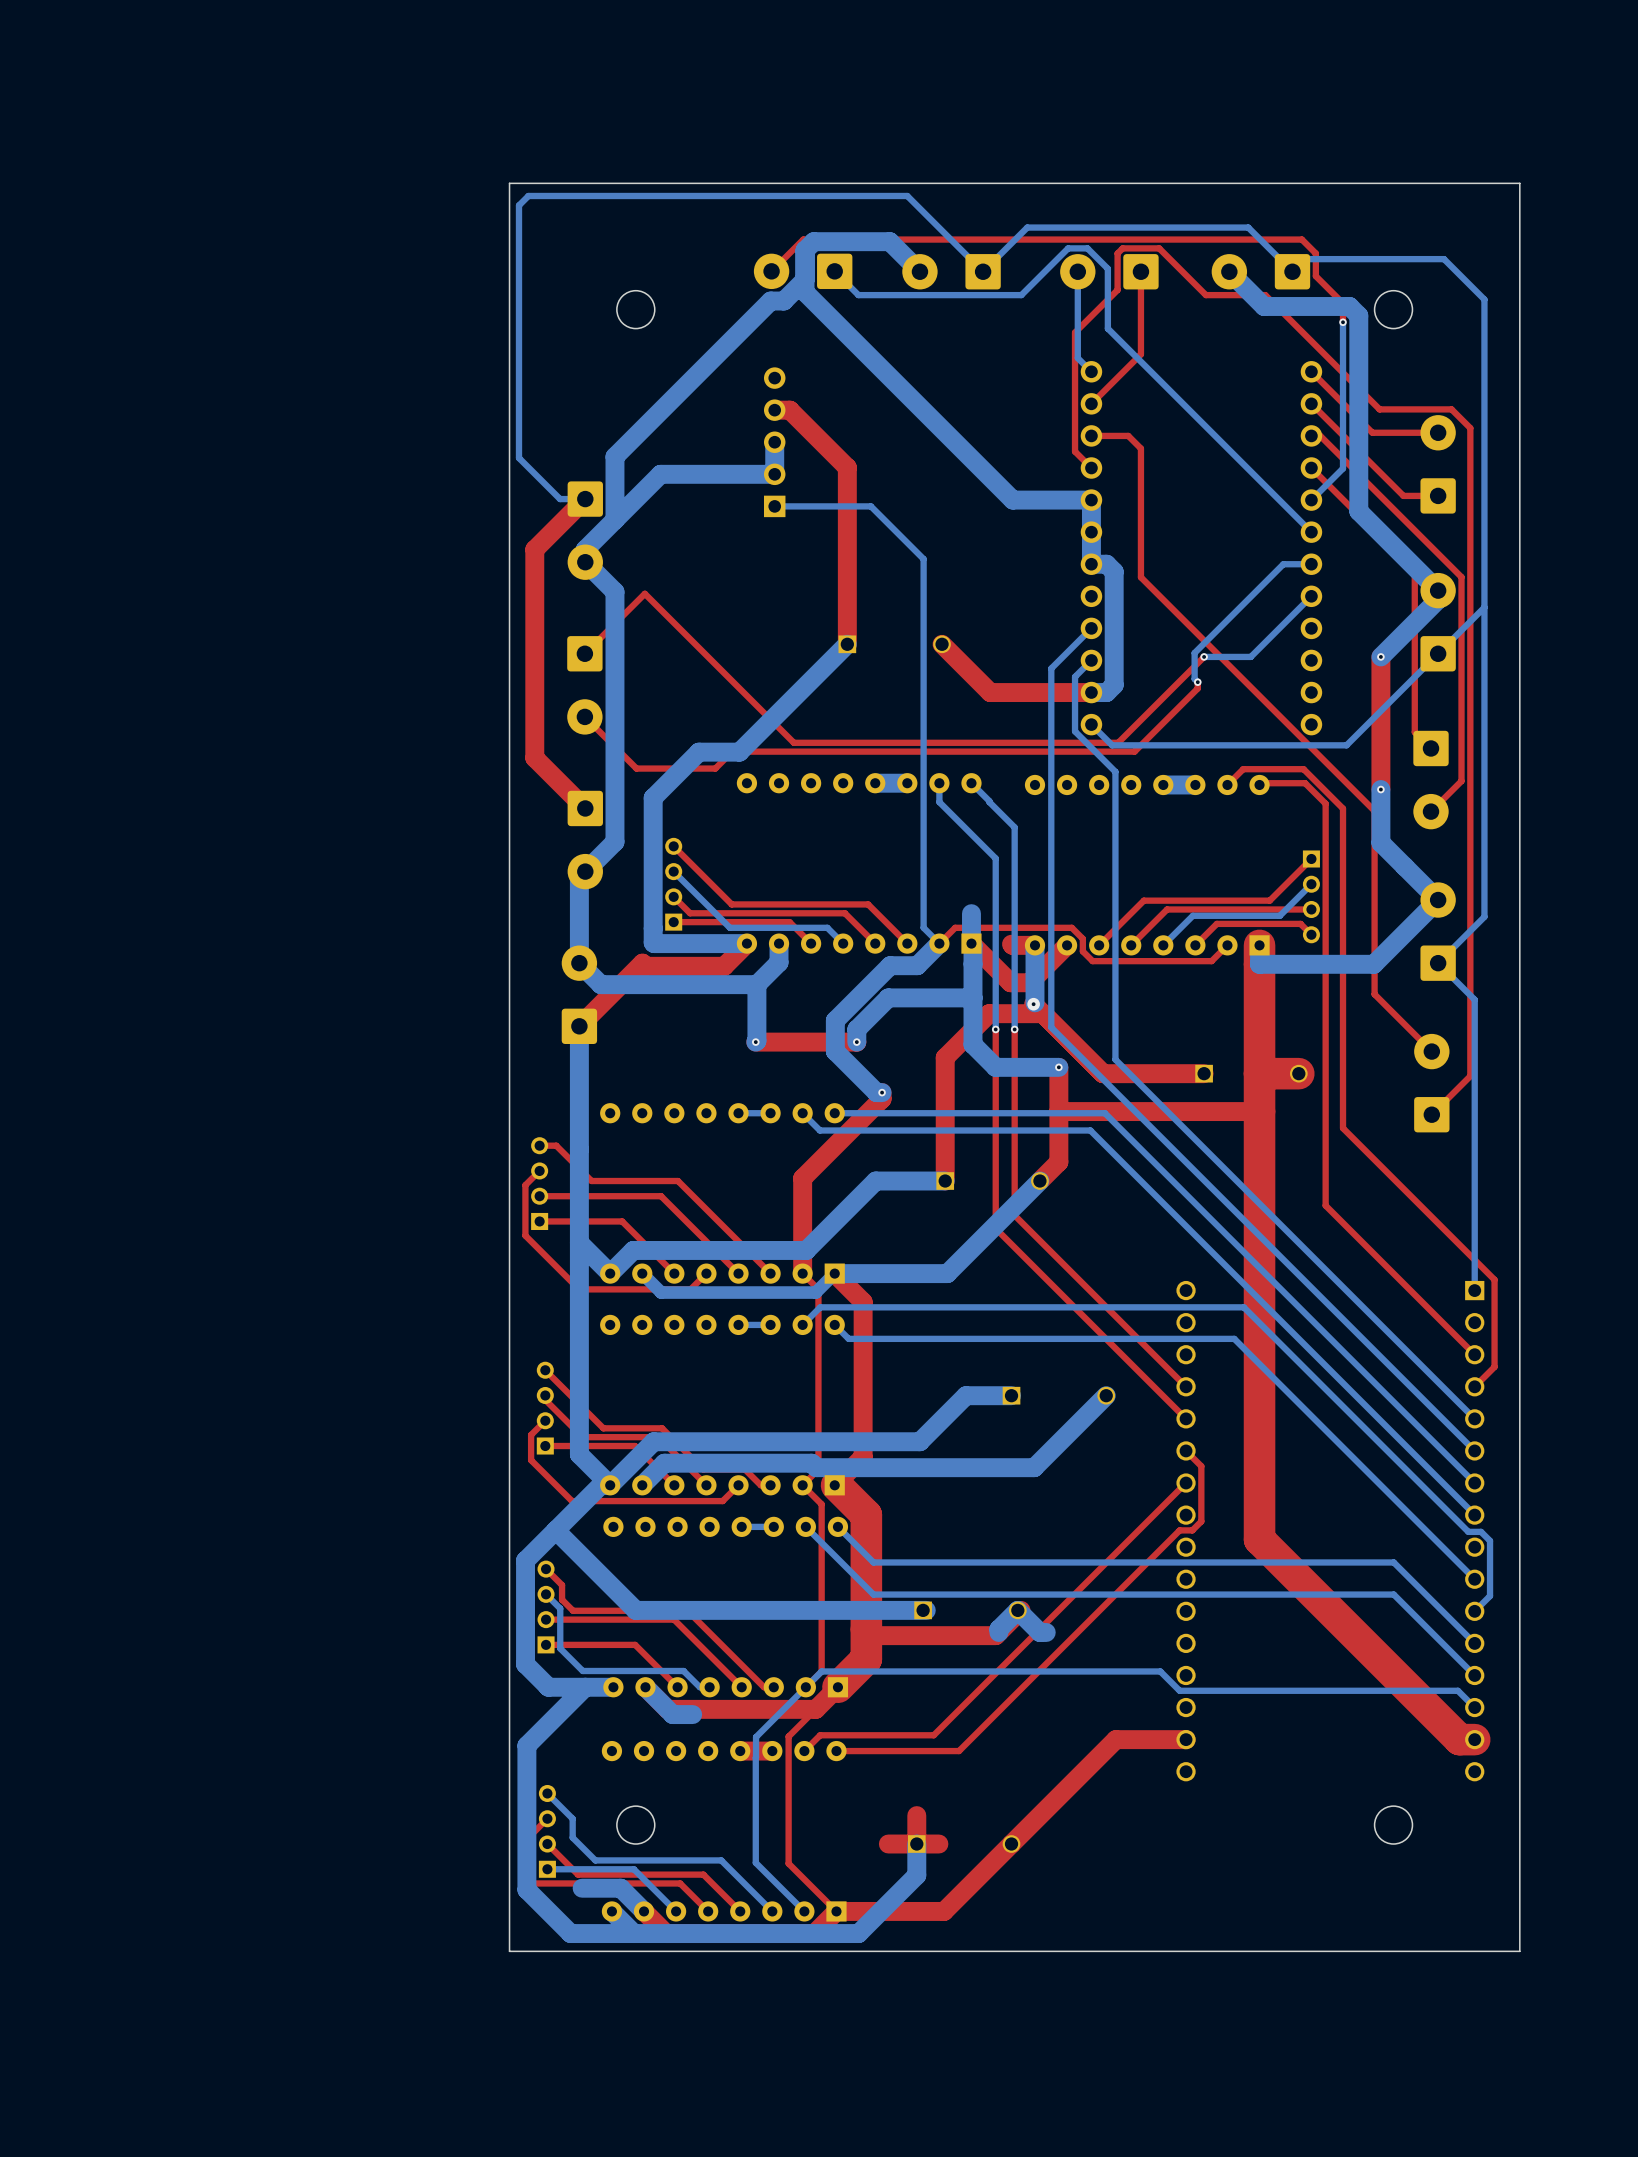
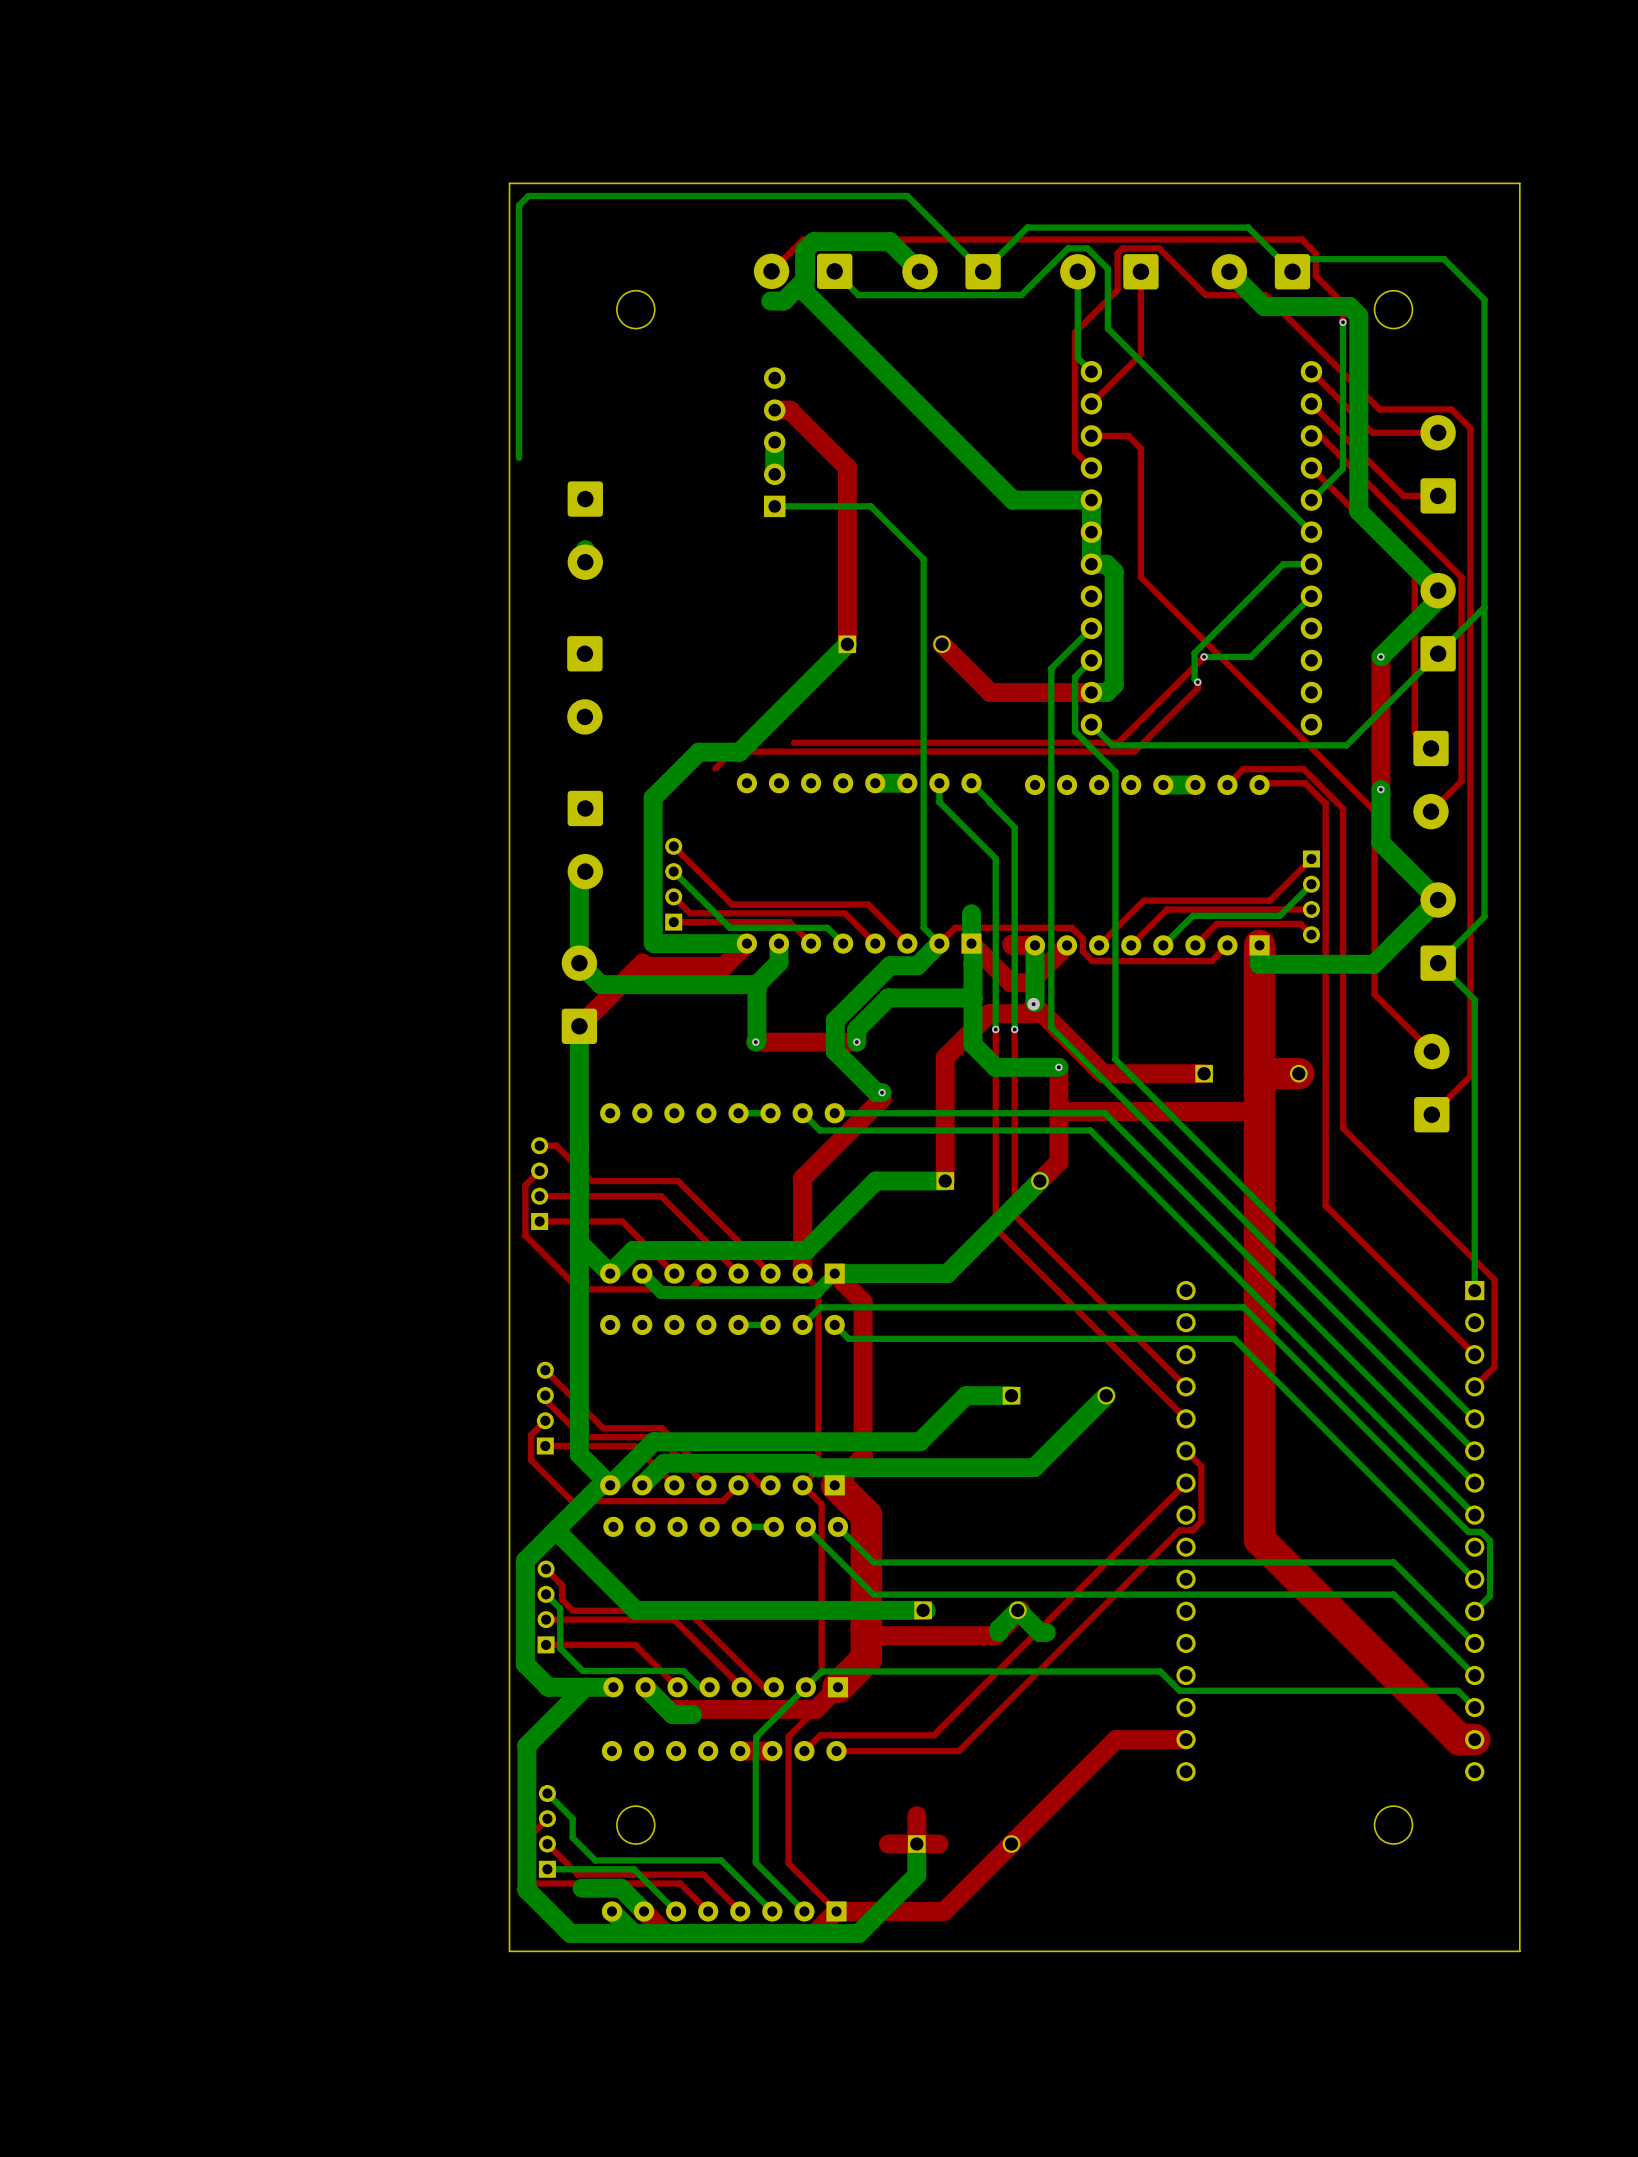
bottom track: (770, 301) (614, 456) (614, 519) -> none
bottom track: (519, 458) (560, 499) (585, 499) -> none
bottom track: (774, 474) (660, 474) (585, 549) -> none
top track: (585, 499) (534, 549) (534, 757) (585, 808) -> none
bottom track: (585, 562) (614, 591) (614, 841) (585, 871) -> none
top track: (584, 653) (644, 593) (793, 742) -> none
top track: (584, 716) (636, 768) (715, 768) -> none

